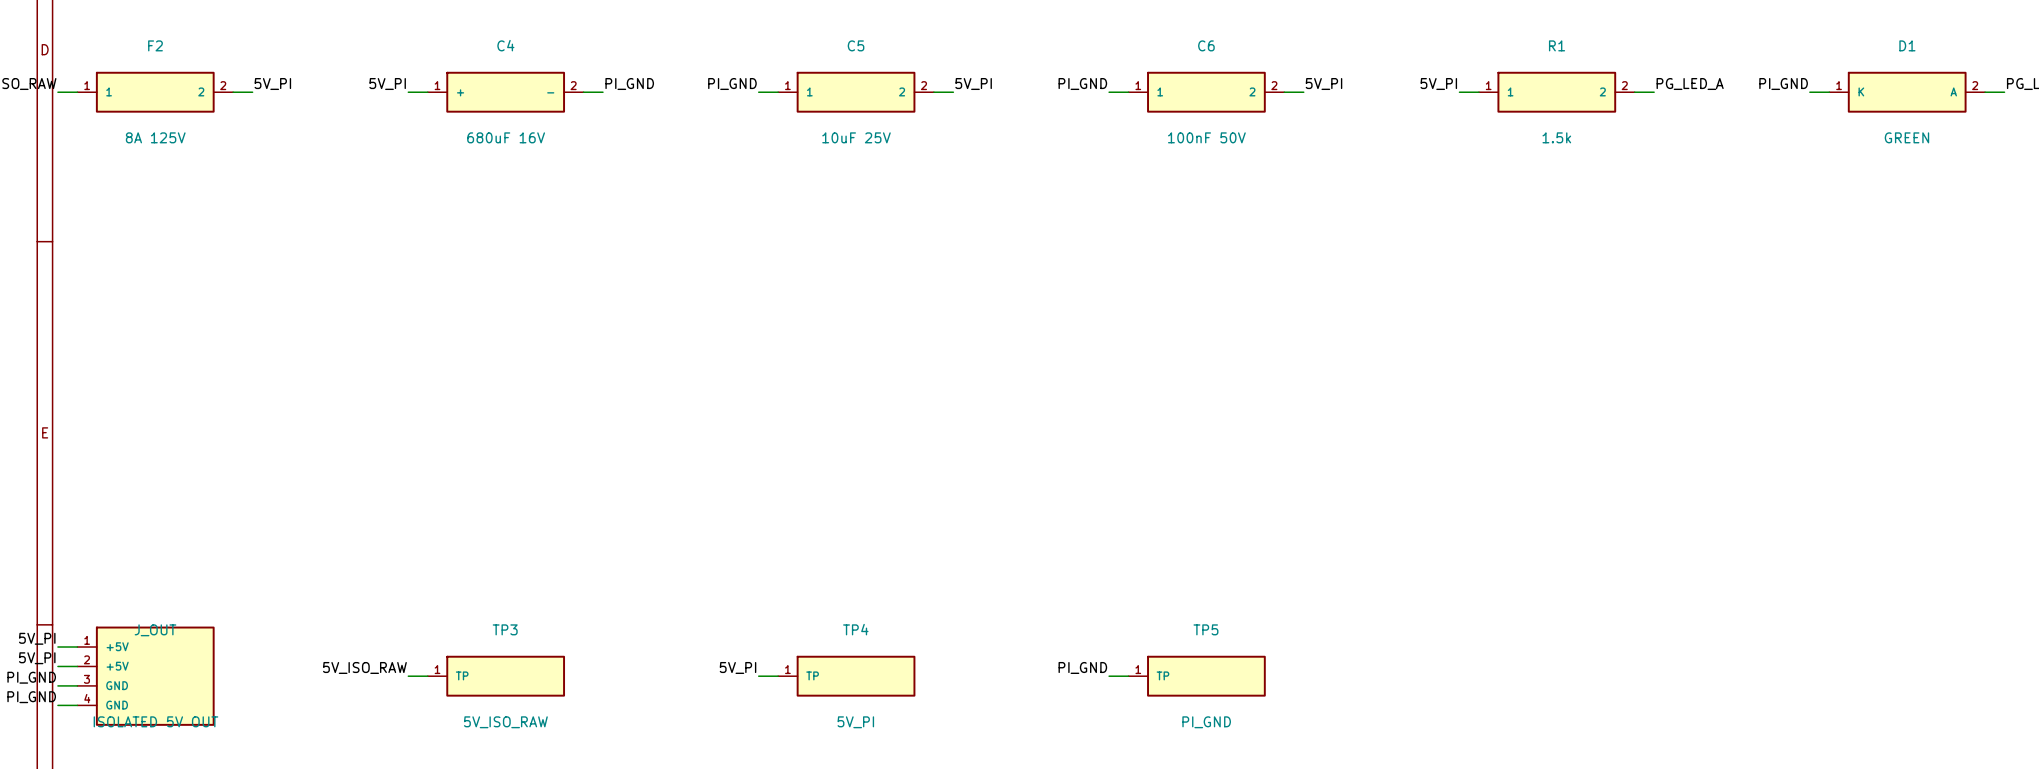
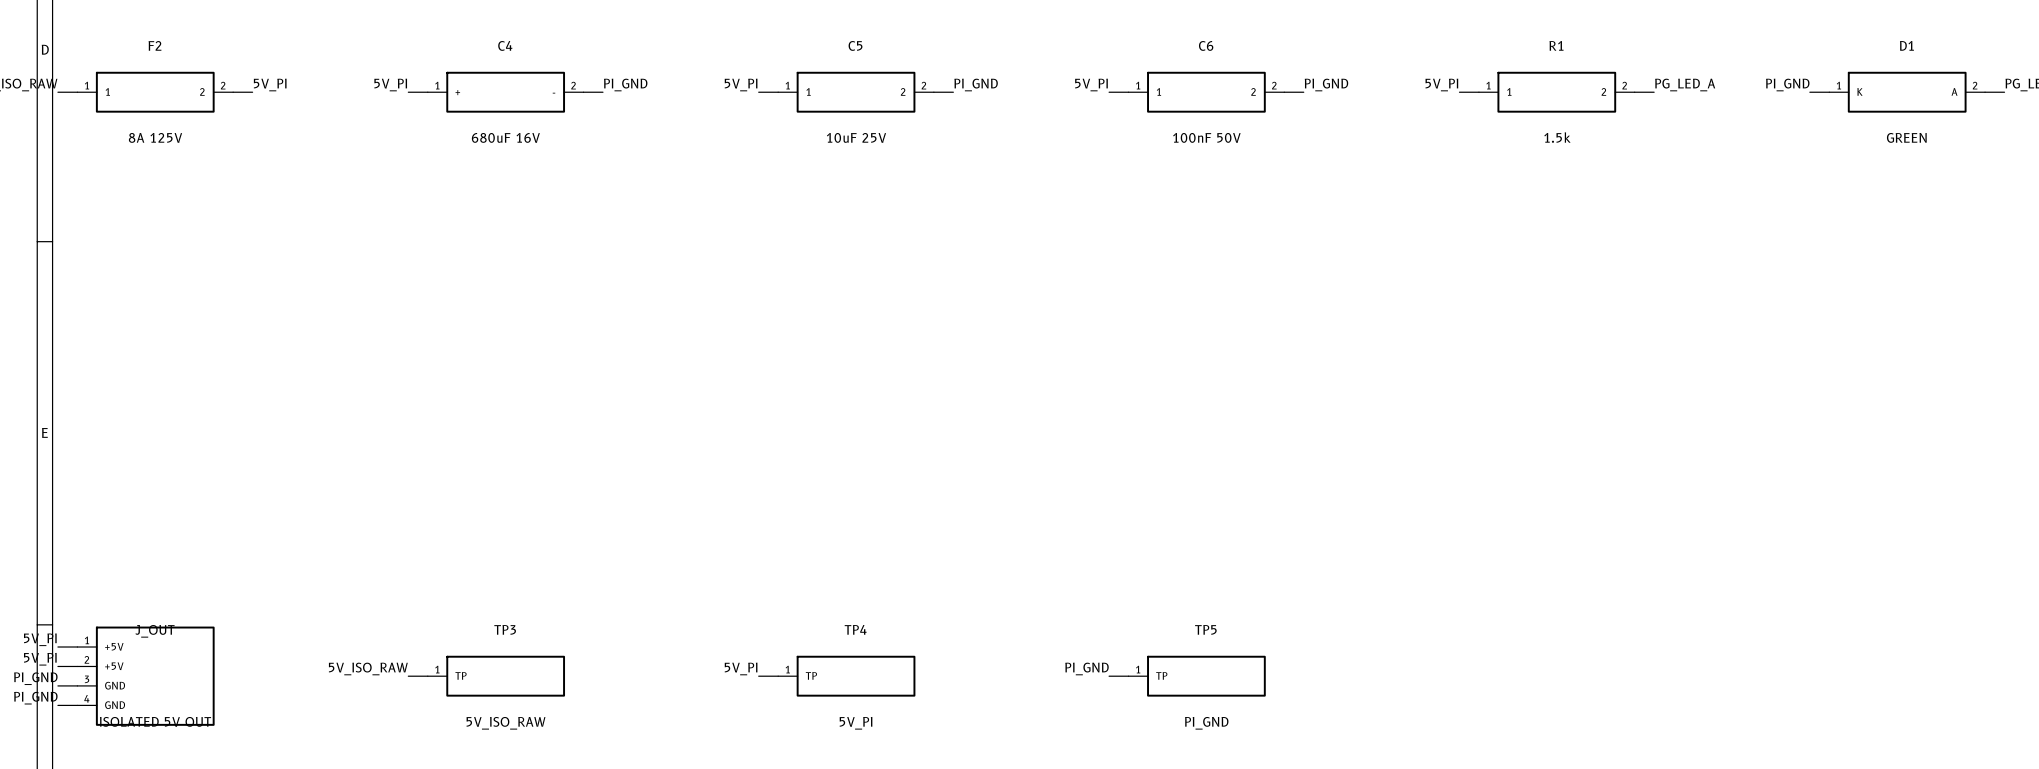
label: PI_GND (732, 84) -> 5V_PI (741, 85)
label: 5V_PI (973, 84) -> PI_GND (976, 85)
label: PI_GND (1082, 84) -> 5V_PI (1091, 85)
label: 5V_PI (1323, 84) -> PI_GND (1326, 85)

